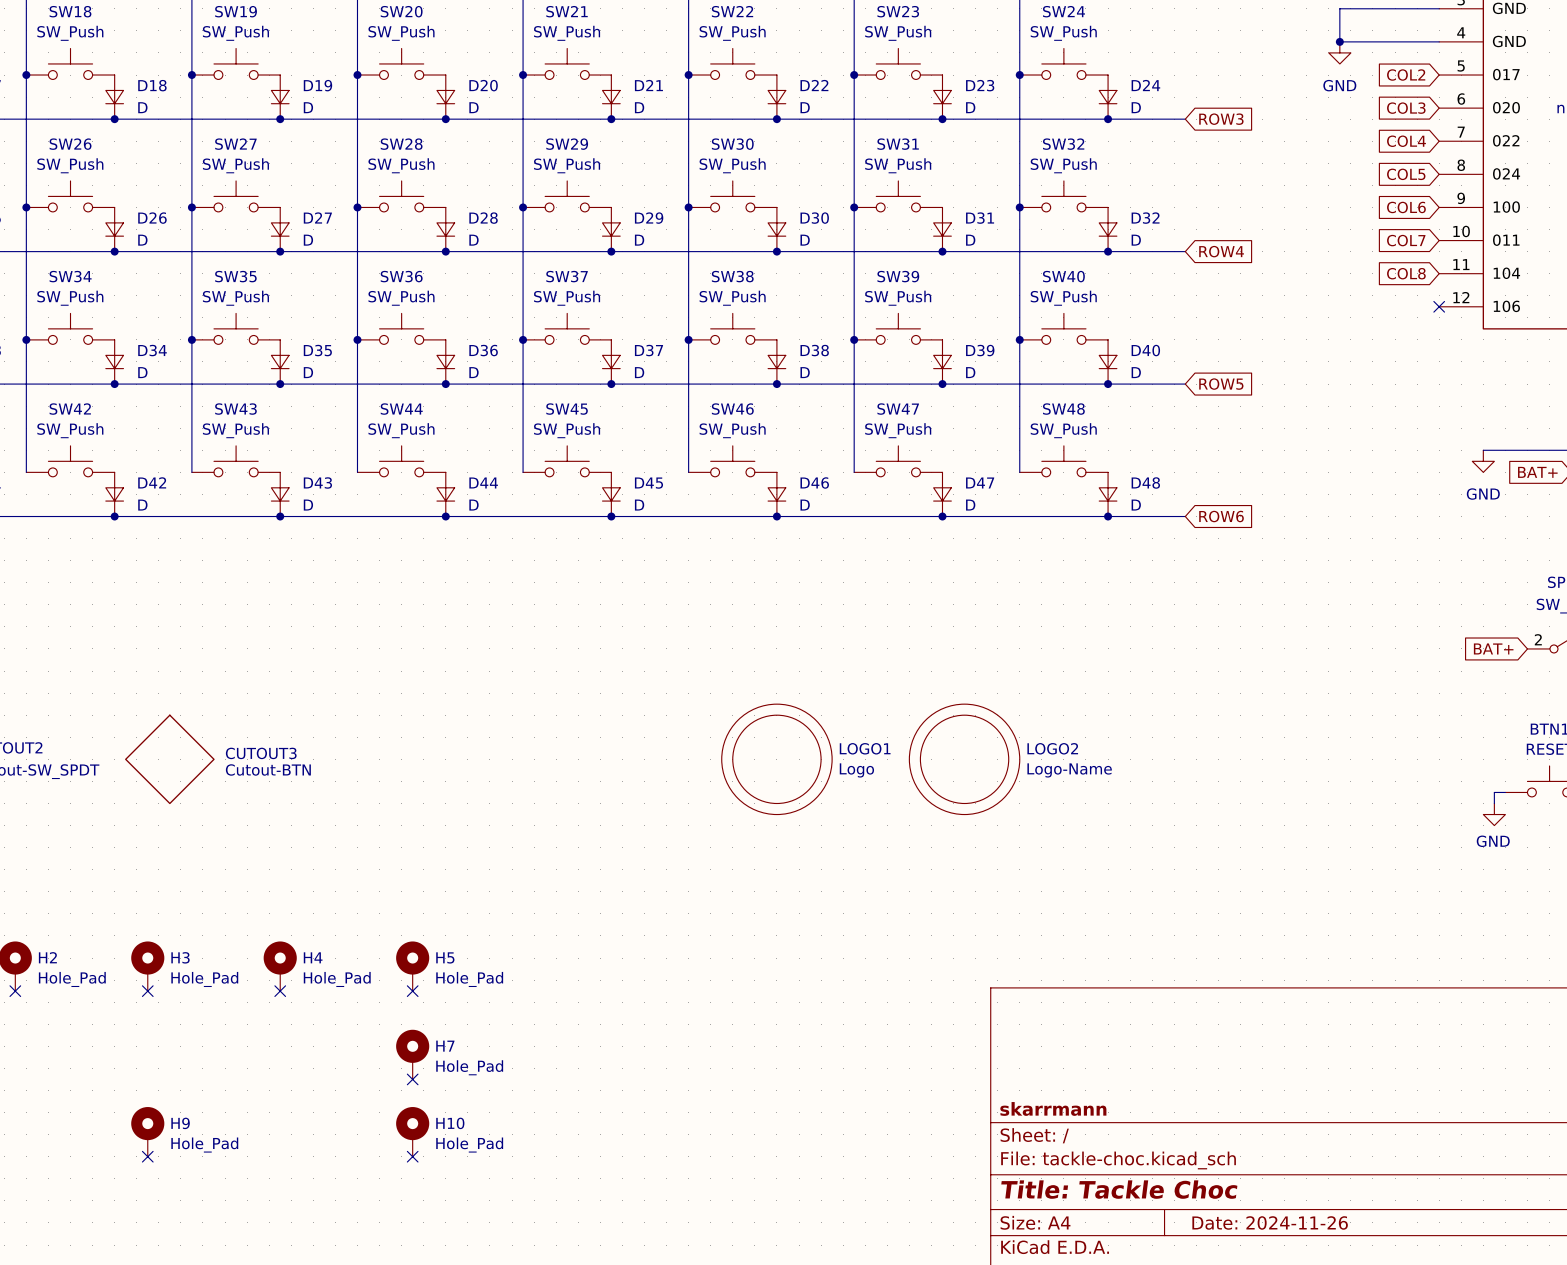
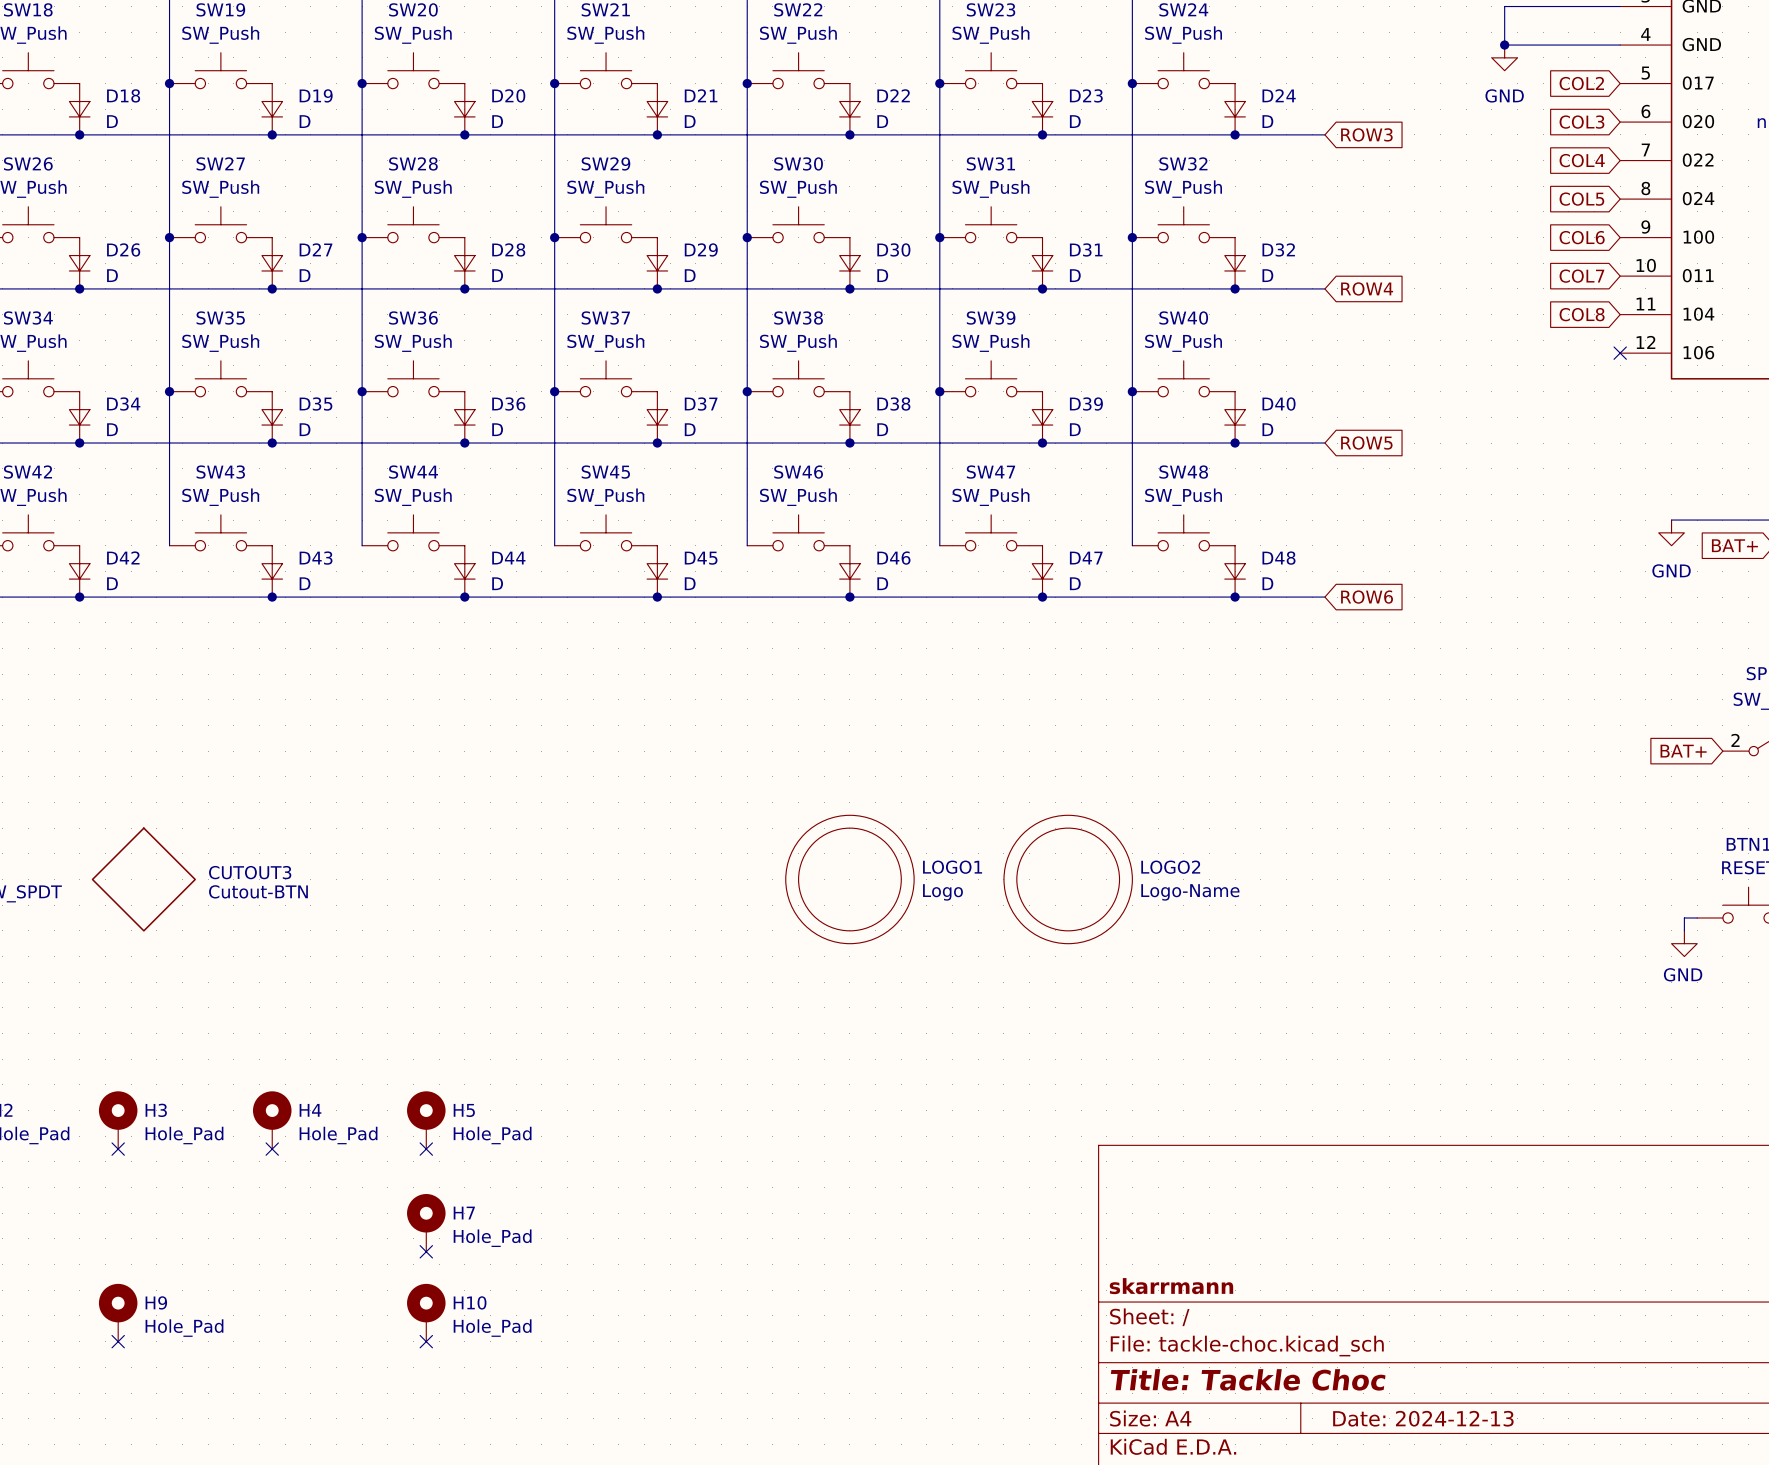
title block: Date: 2024-11-26 (1270, 1222) -> Date: 2024-12-13 (1423, 1418)

